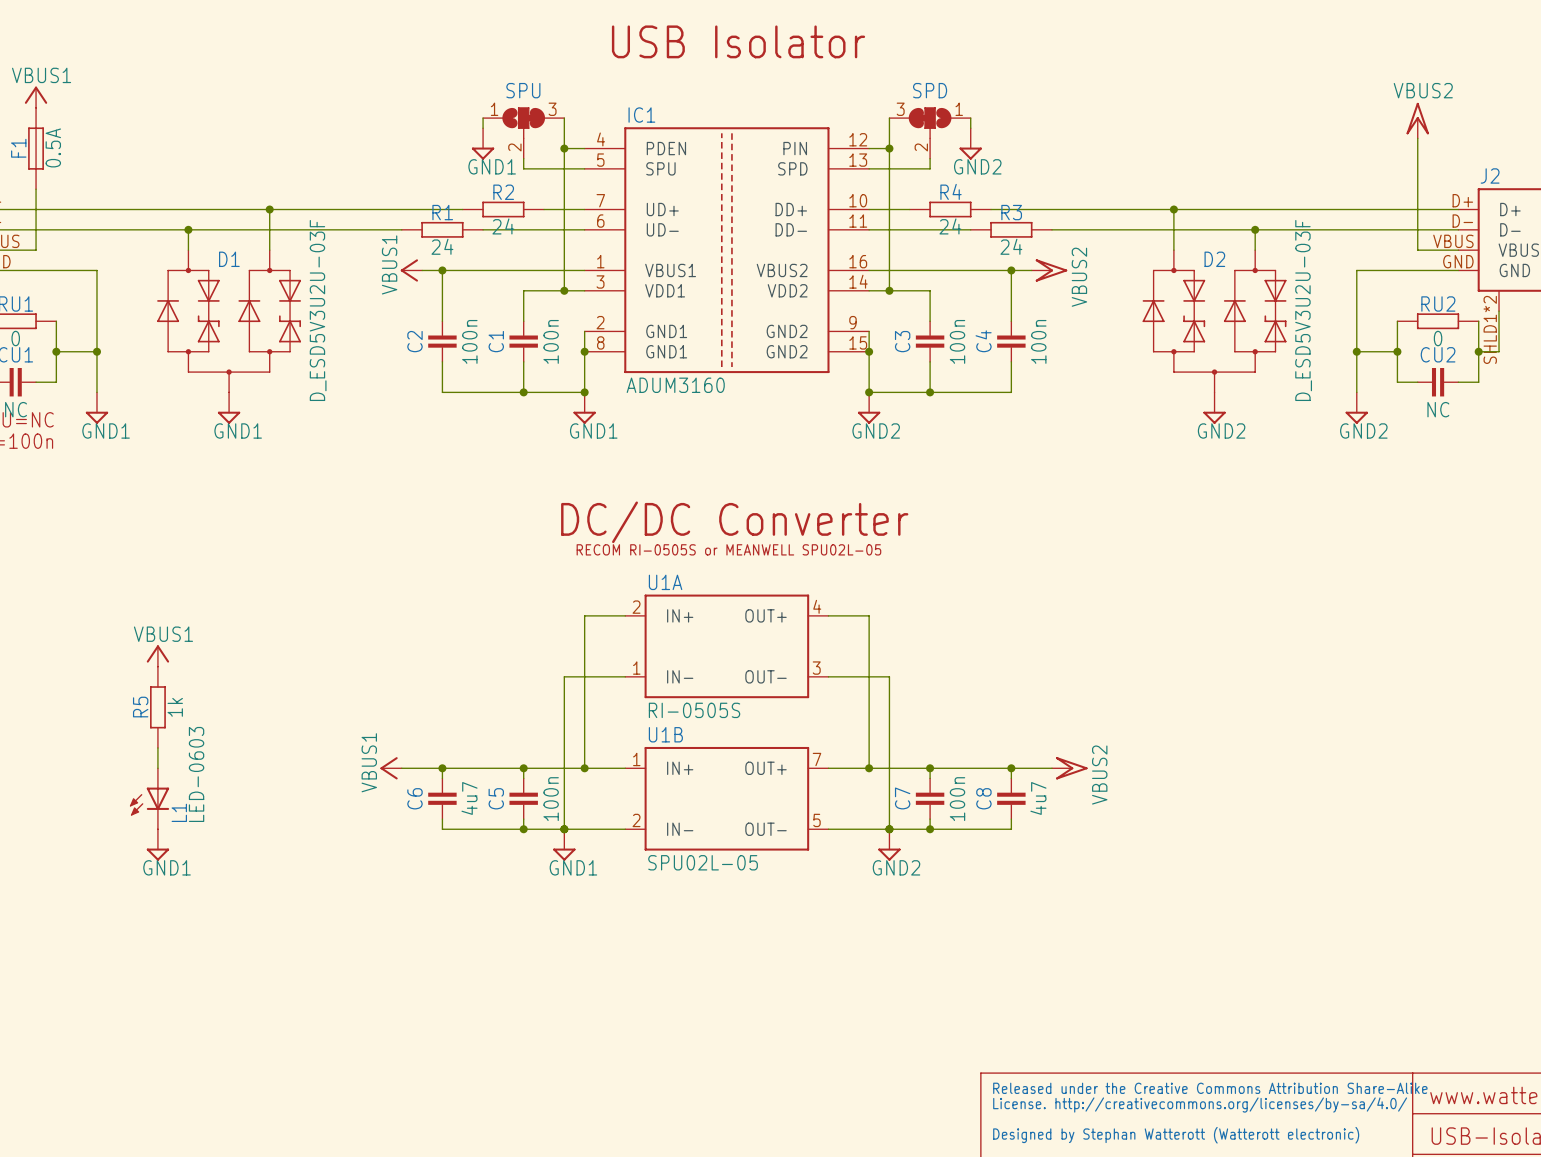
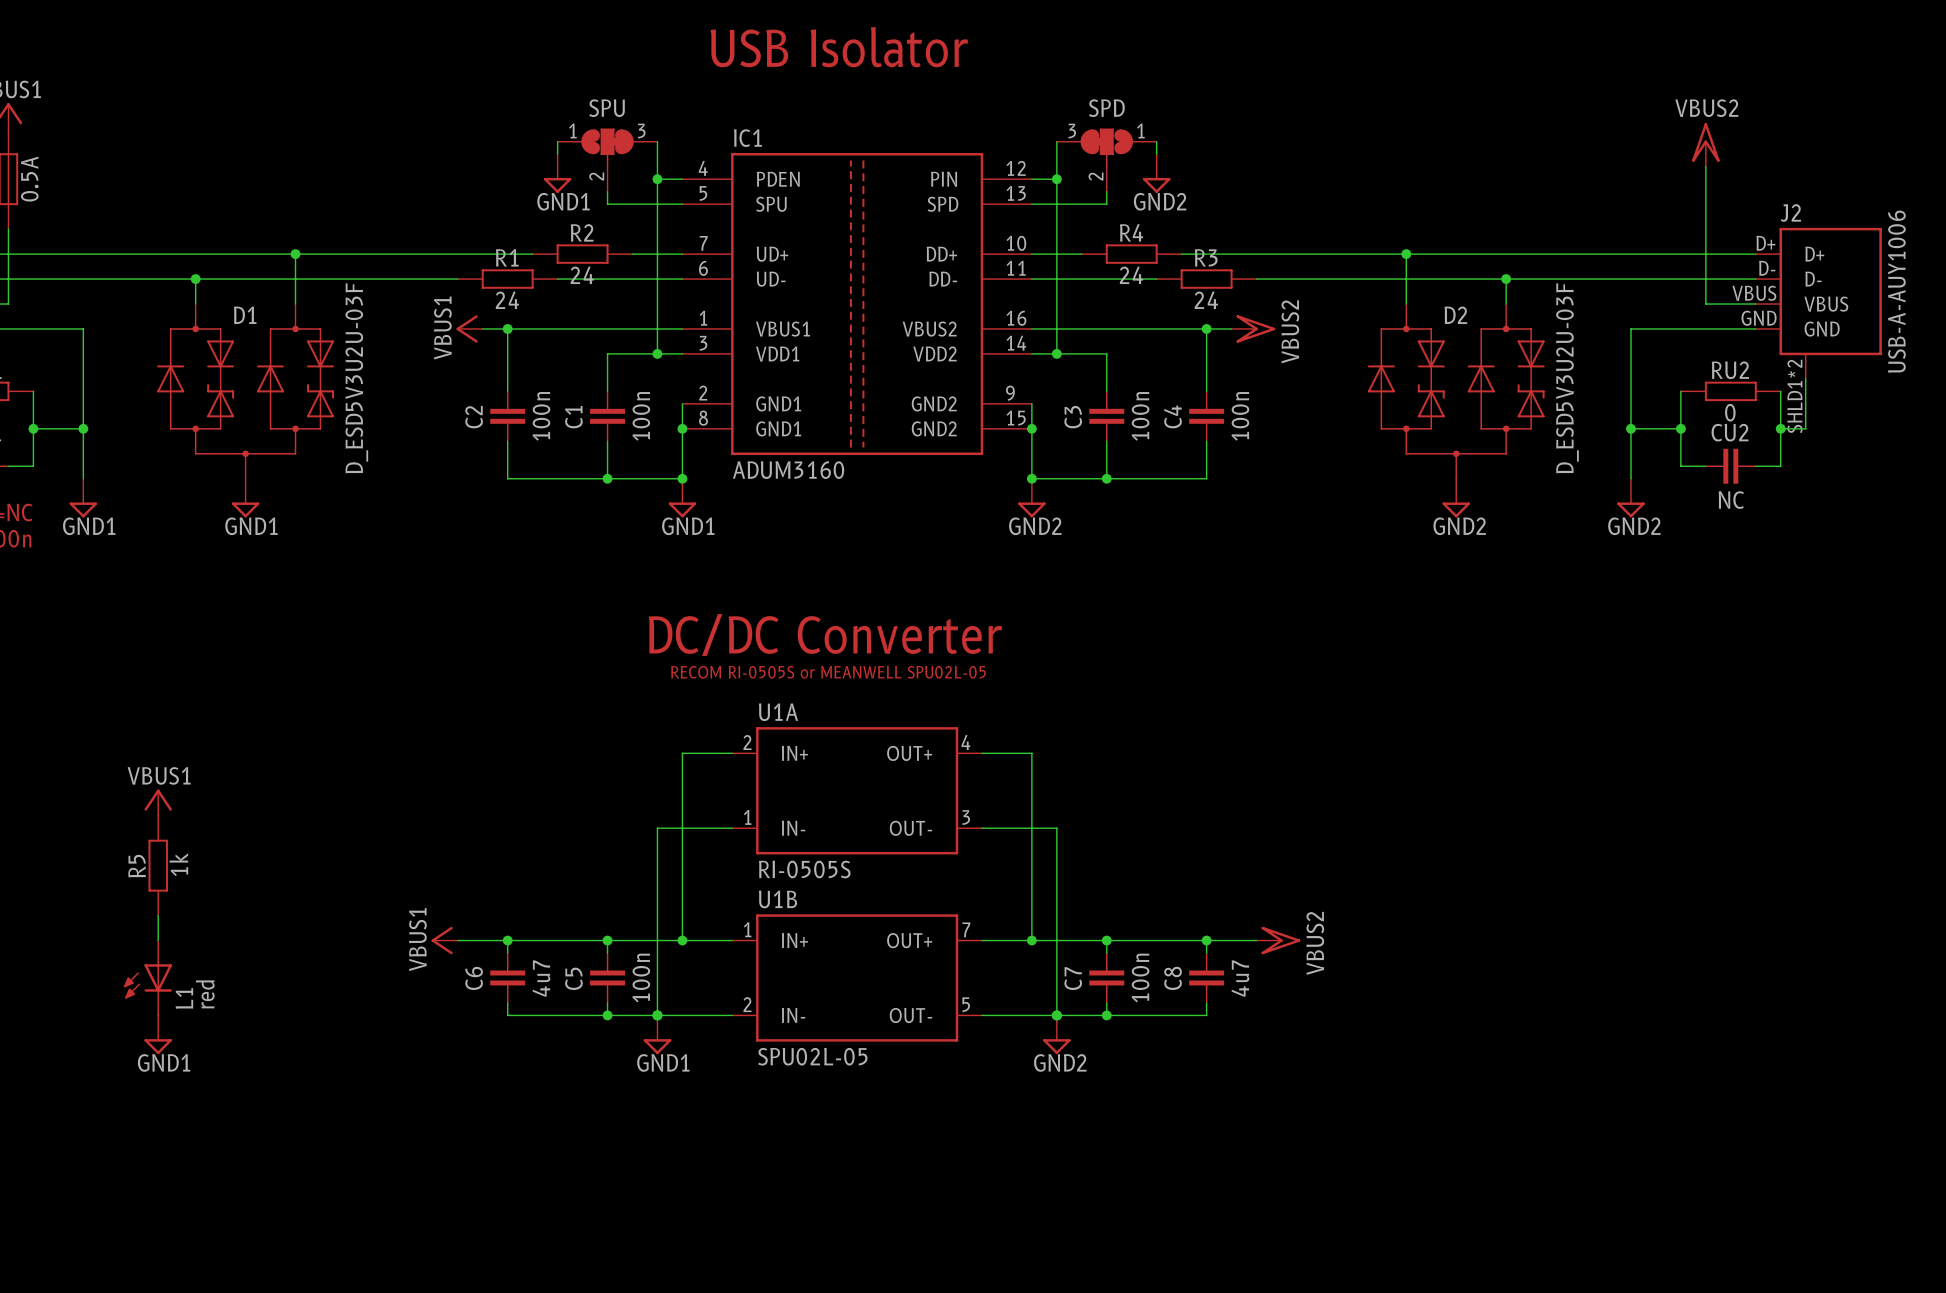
L1 value: LED-0603 (196, 774) -> red (205, 994)

